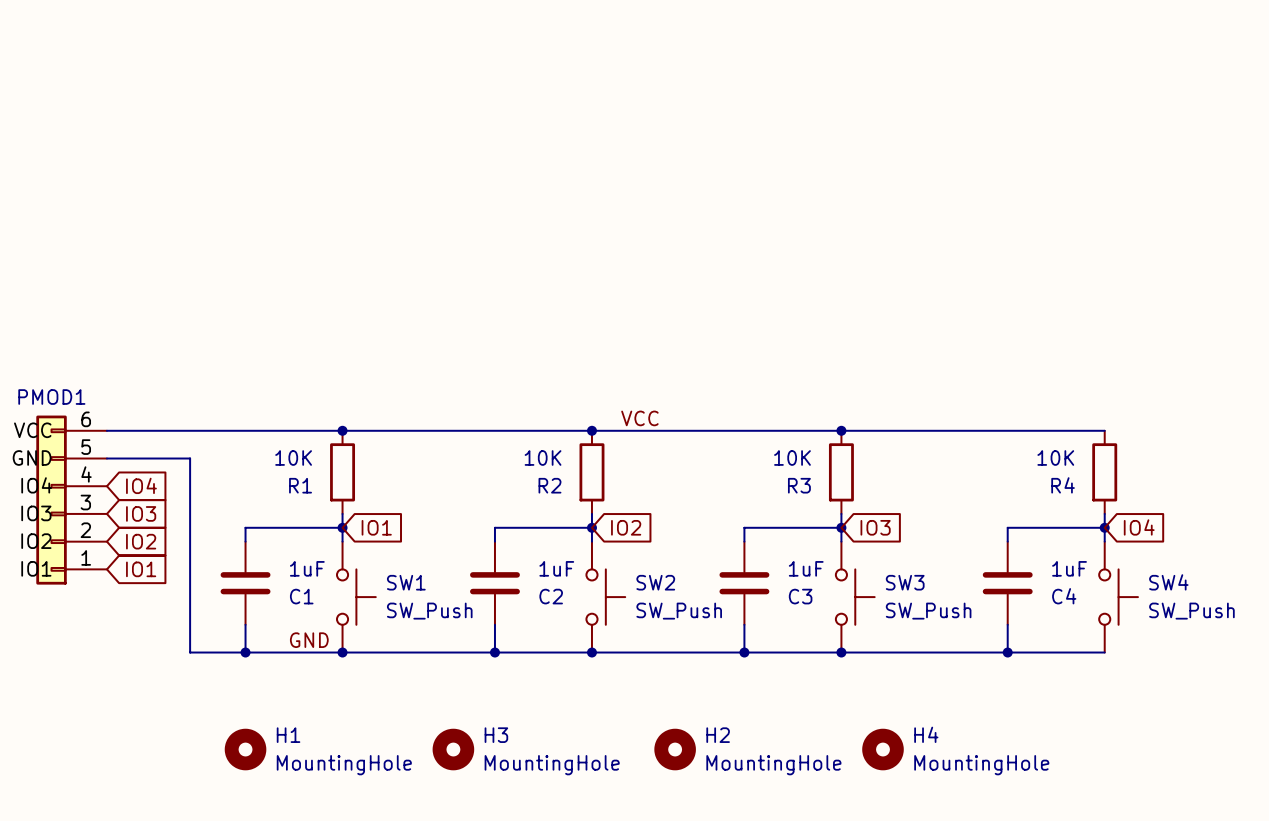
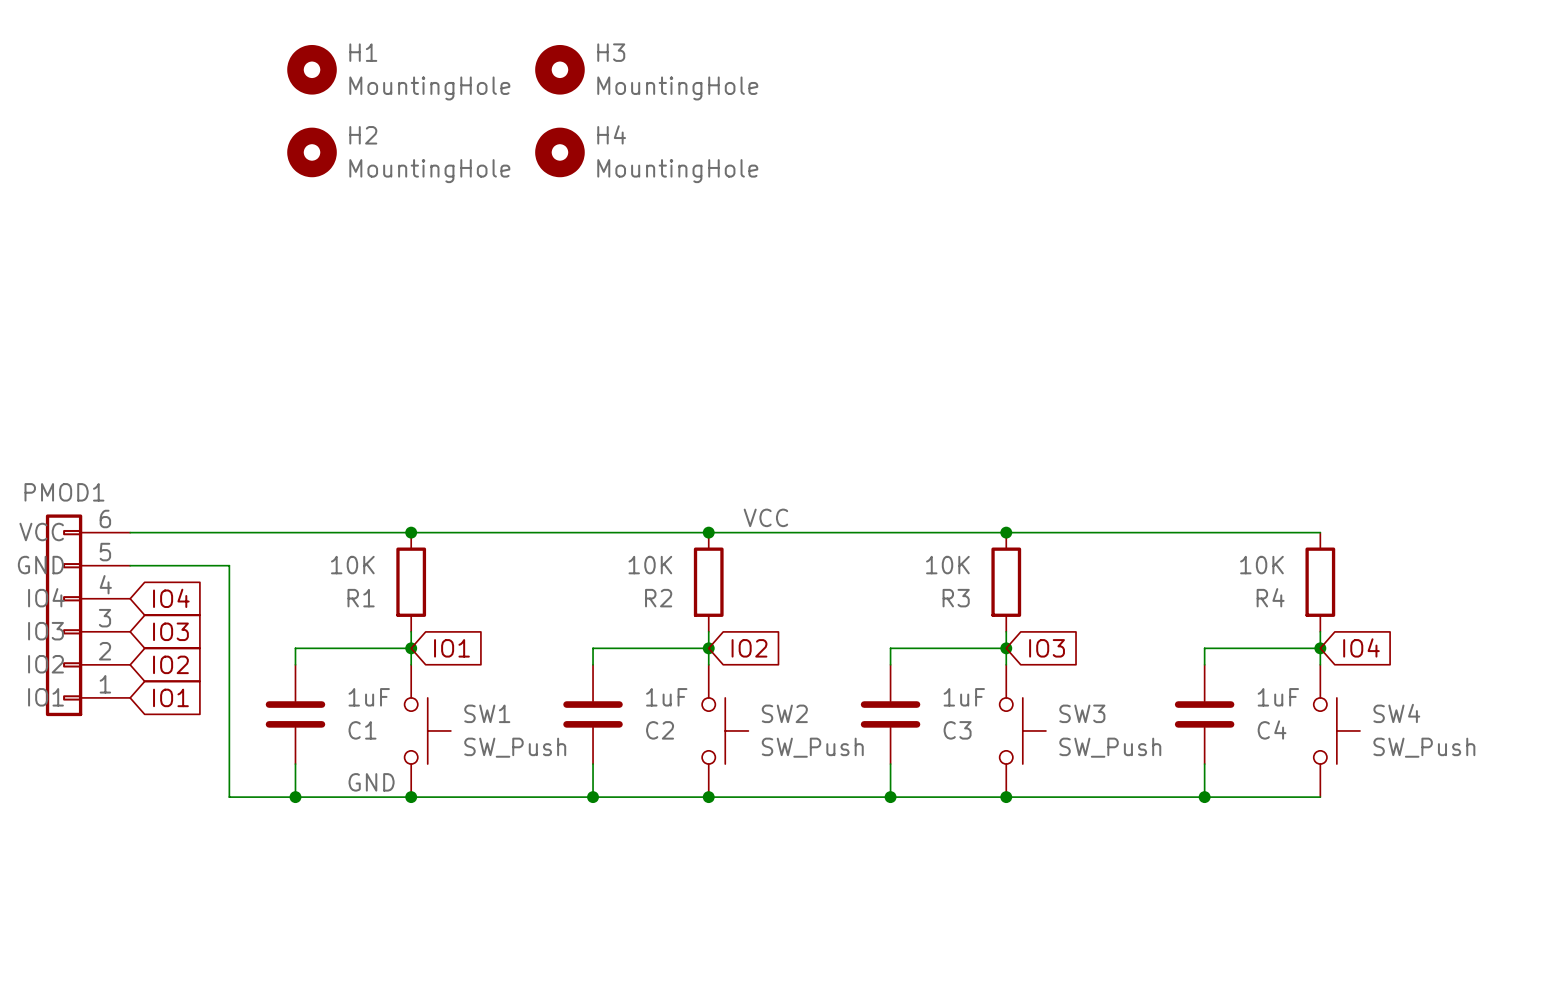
H1 position: (245, 749) -> (312, 69)
H3 position: (453, 749) -> (559, 69)
H2 position: (675, 749) -> (312, 152)
H4 position: (882, 749) -> (559, 152)

